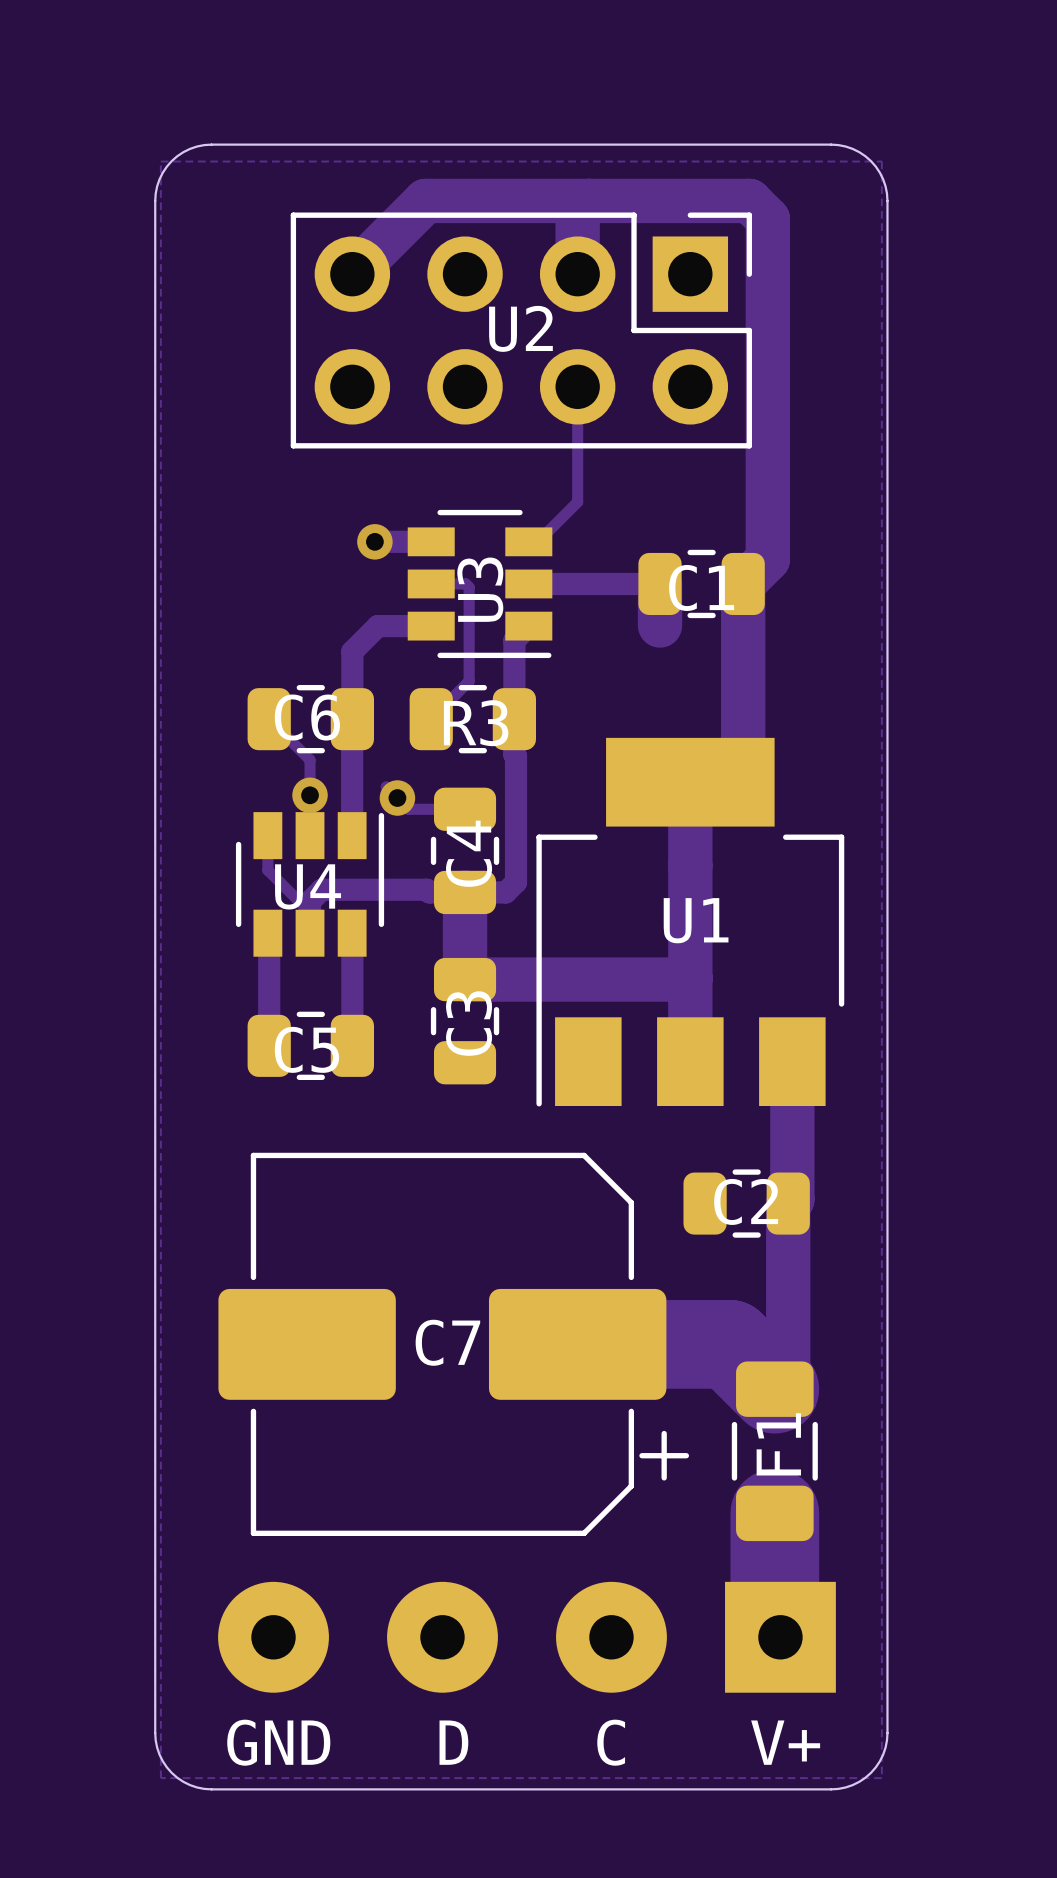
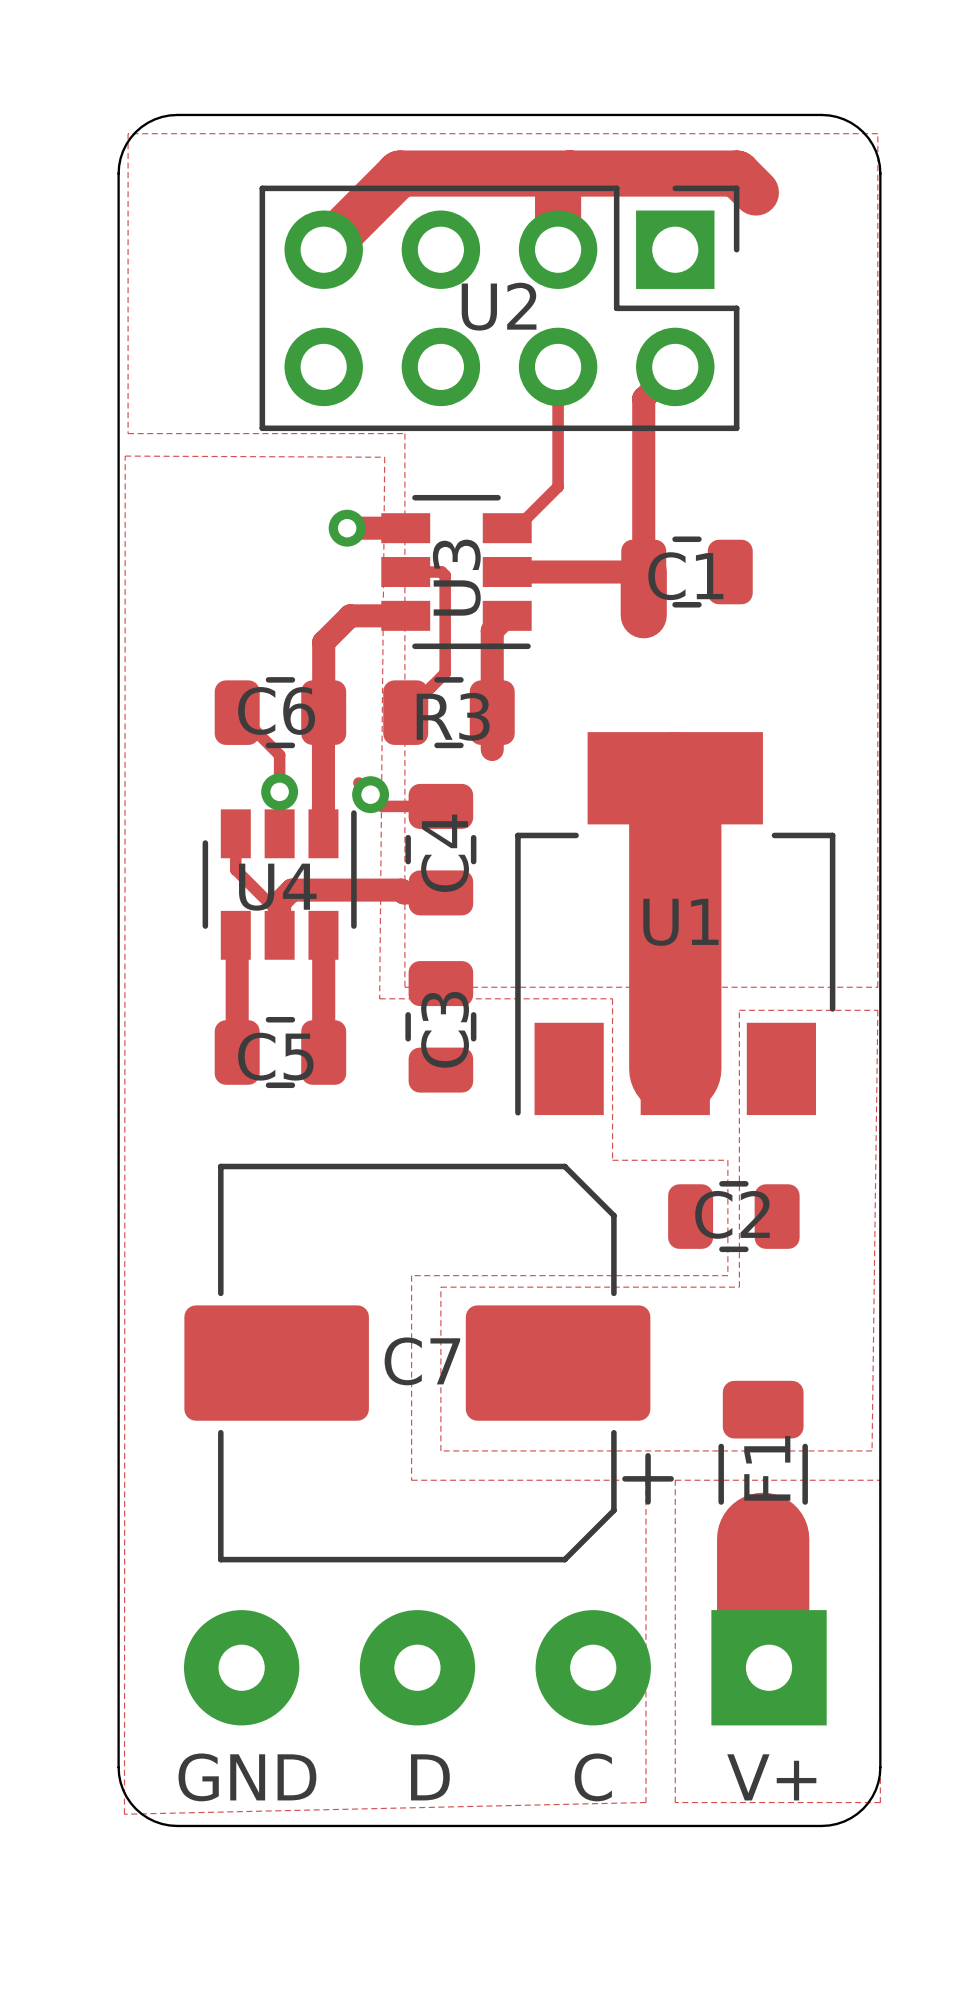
zone outline: (160, 161) (881, 161) (881, 1778) (160, 1778) (160, 161) -> (128, 133) (128, 433) (404, 433) (404, 987) (877, 987) (877, 133) (128, 133)
track: (767, 219) (767, 559) (743, 583) (743, 786) -> none
track: none -> (675, 366) (643, 398) (643, 572)
zone outline: none -> (125, 456) (384, 457) (379, 998) (612, 998) (612, 1160) (727, 1160) (727, 1275) (411, 1275) (411, 1480) (645, 1480) (645, 1802) (124, 1814) (125, 456)
track: (514, 754) (516, 756) (516, 882) (505, 892) (465, 892) (465, 979) (690, 978) -> none
track width: thin (690, 782) (690, 1061) -> thick (675, 778) (675, 1068)
zone outline: none -> (739, 1010) (877, 1010) (872, 1450) (440, 1450) (440, 1287) (739, 1287) (739, 1010)
track: (792, 1061) (792, 1199) (788, 1203) (788, 1375) (774, 1389) (730, 1344) (577, 1344) -> none
zone outline: none -> (675, 1480) (880, 1480) (880, 1802) (675, 1802) (675, 1480)

